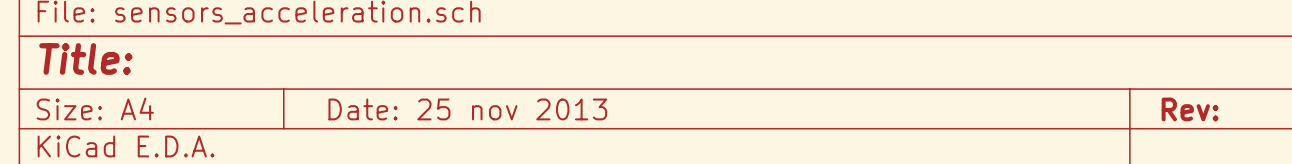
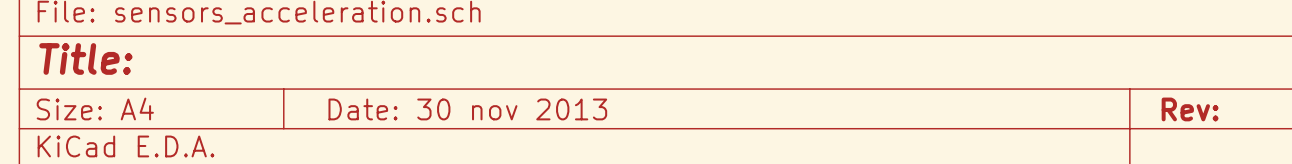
title block: Date: 25 nov 2013 (467, 109) -> Date: 30 nov 2013 (467, 109)

